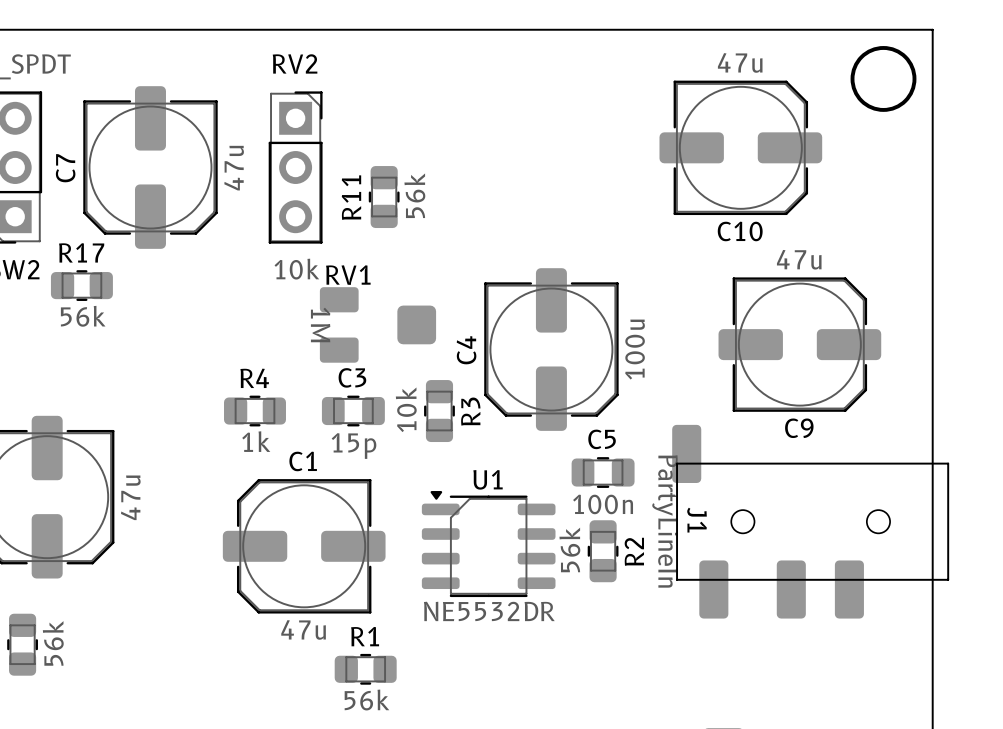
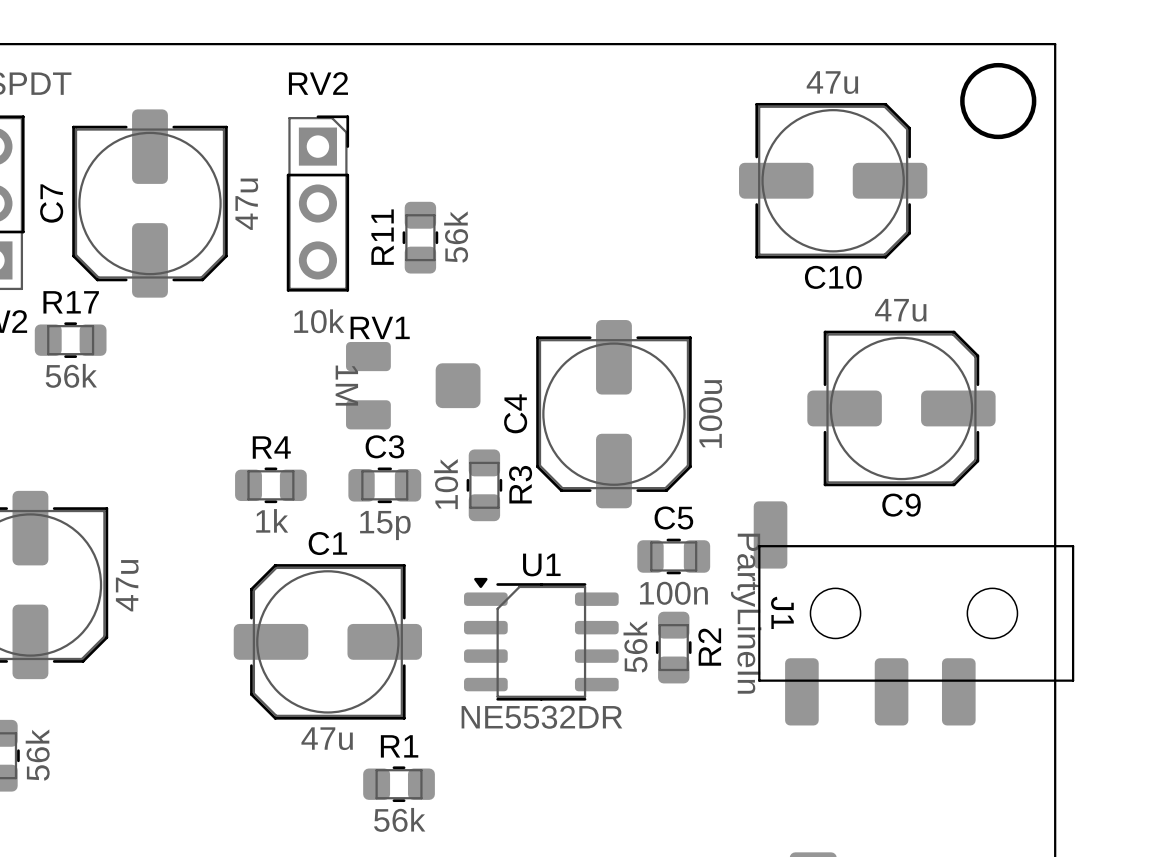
J1 footprint: [672, 424, 950, 619] -> [753, 501, 1075, 726]

